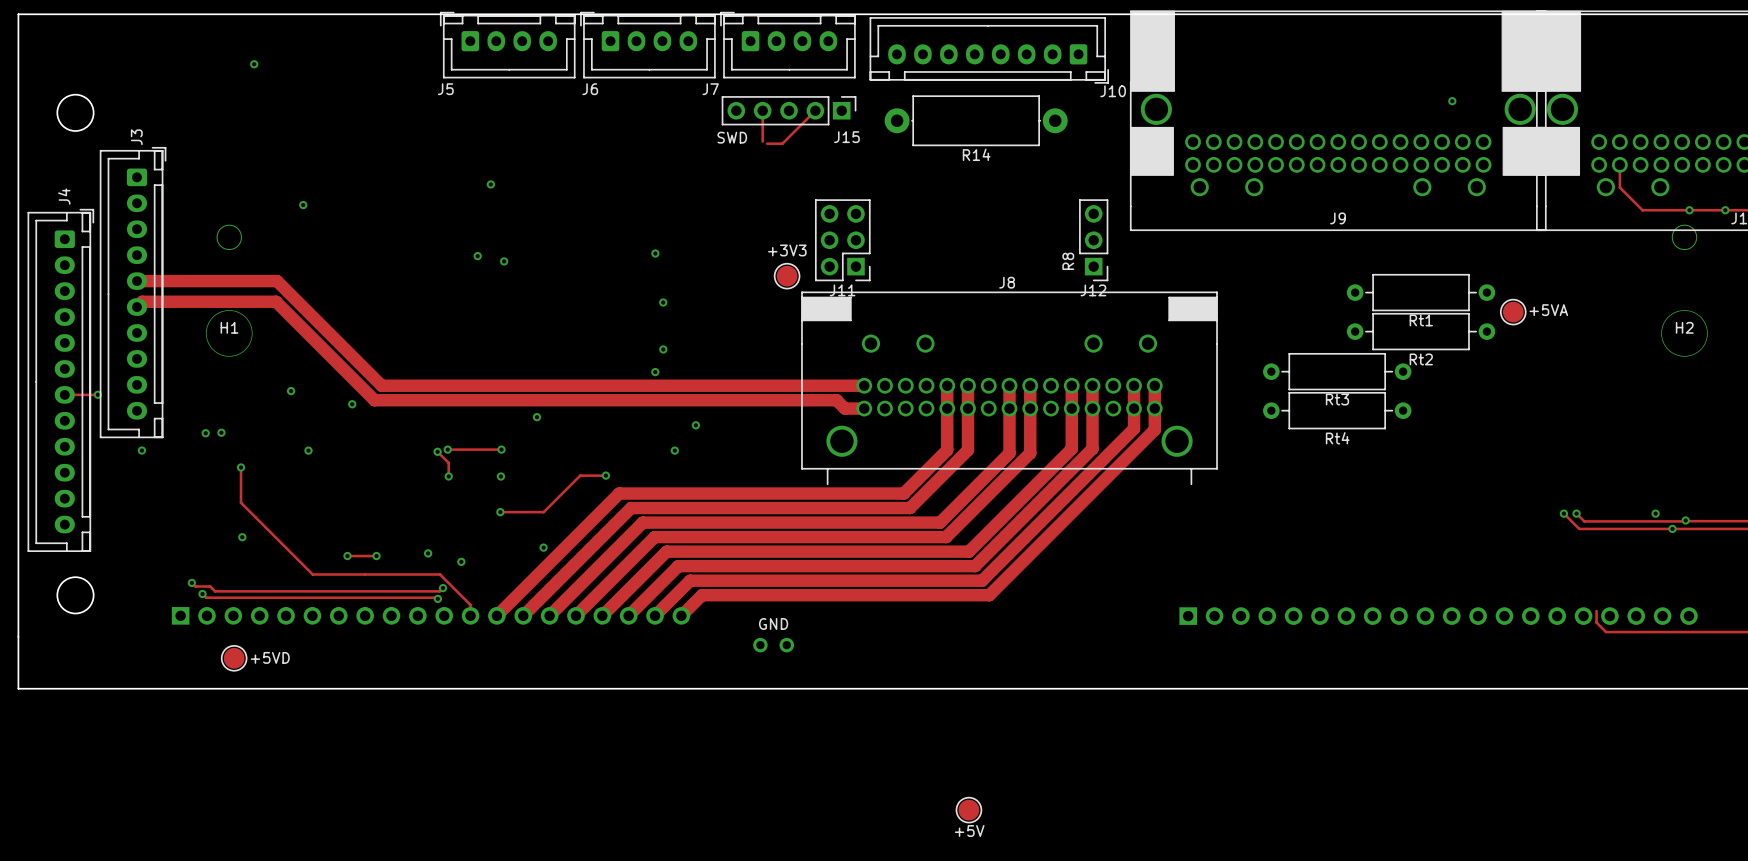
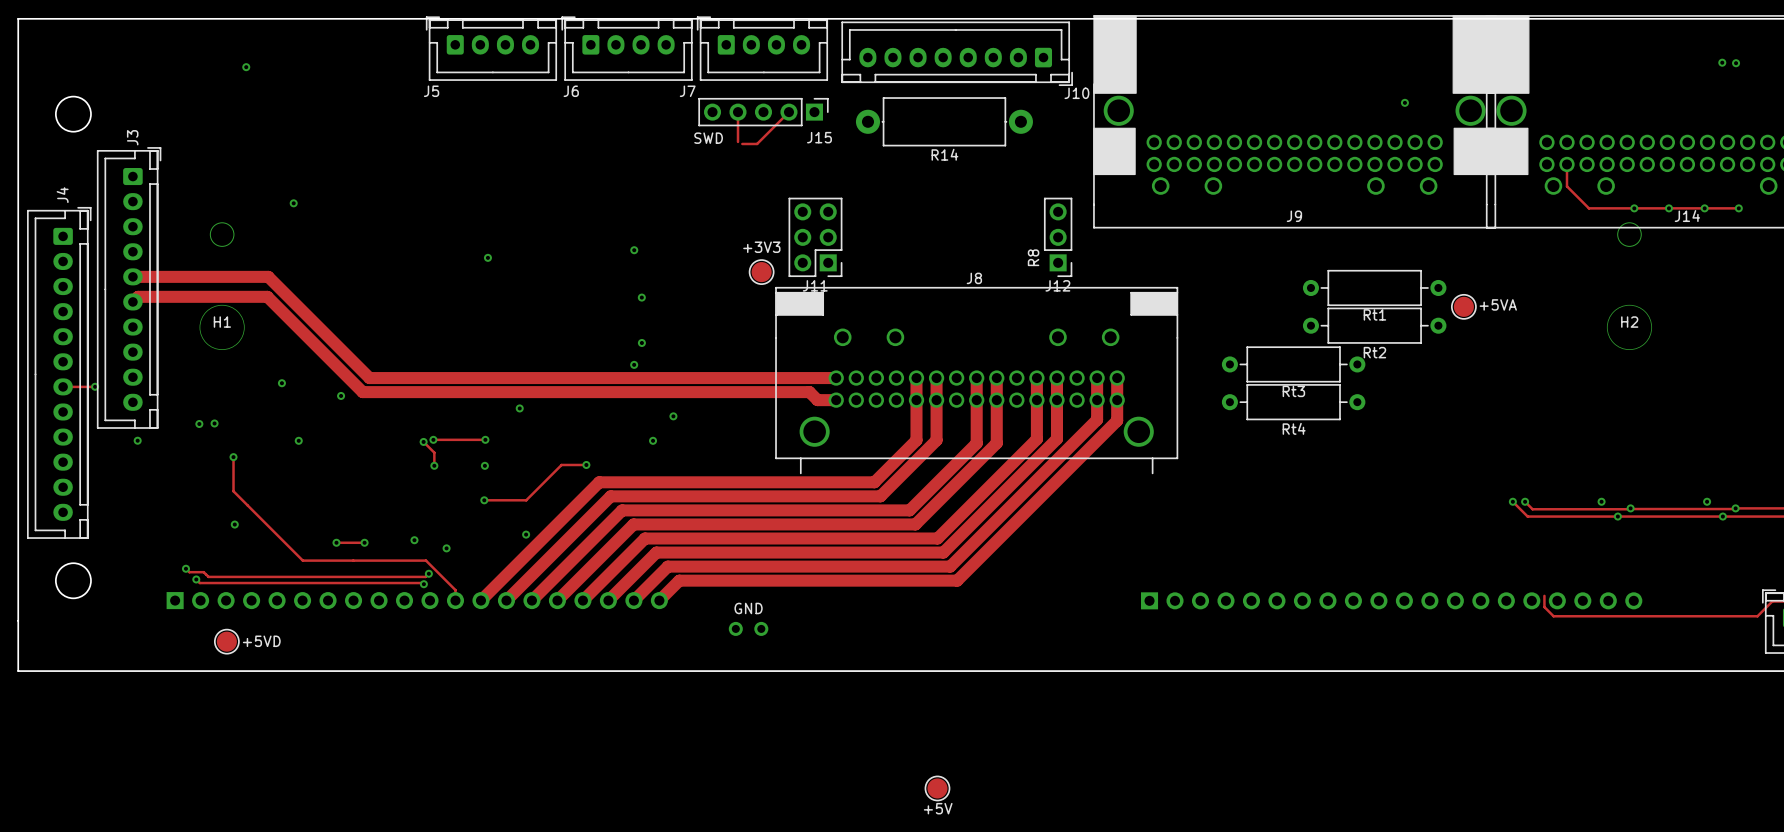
via: (490, 184) -> none
via: (477, 256) -> none

